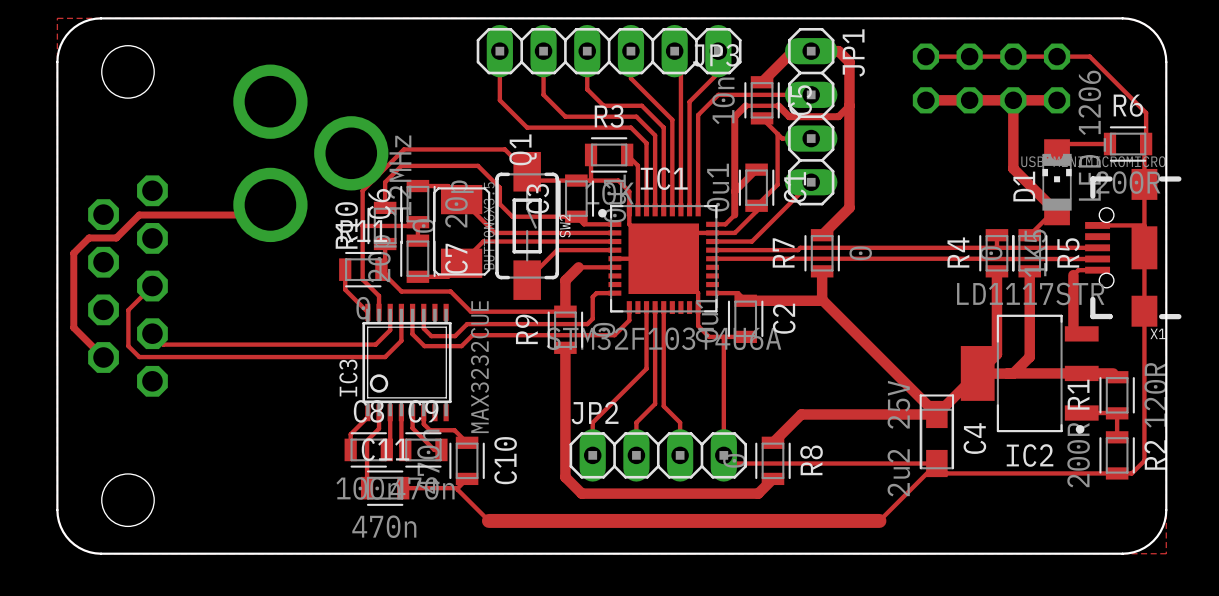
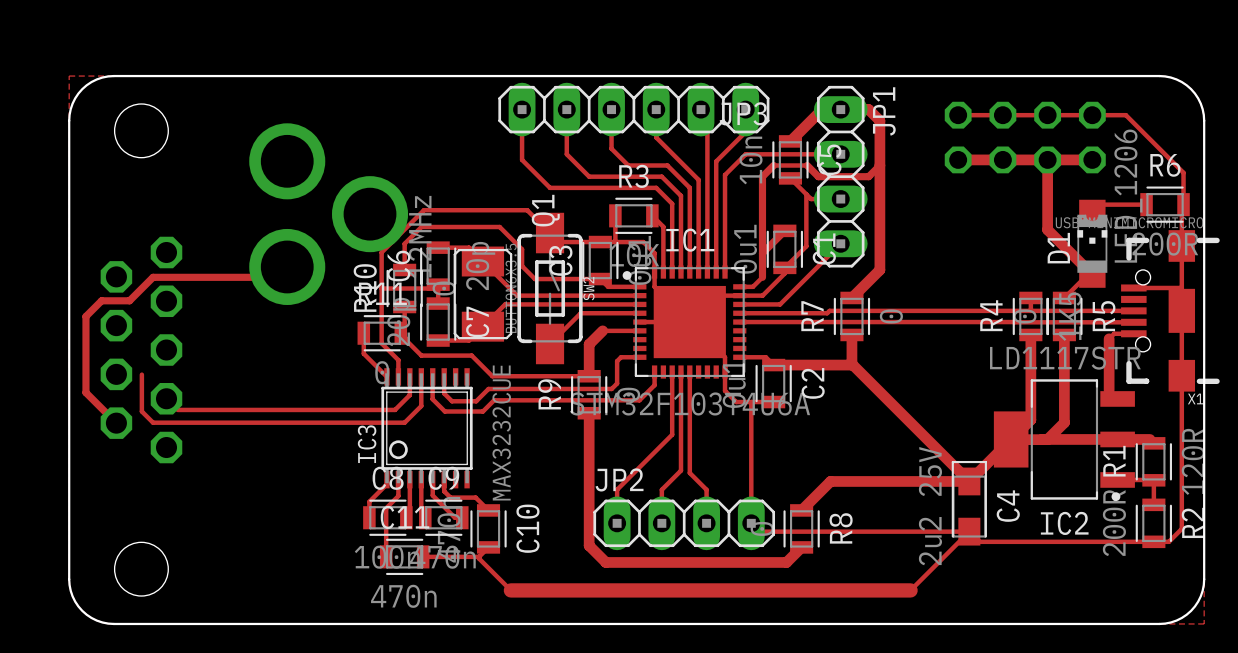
track: (152, 286) (128, 310) -> none

